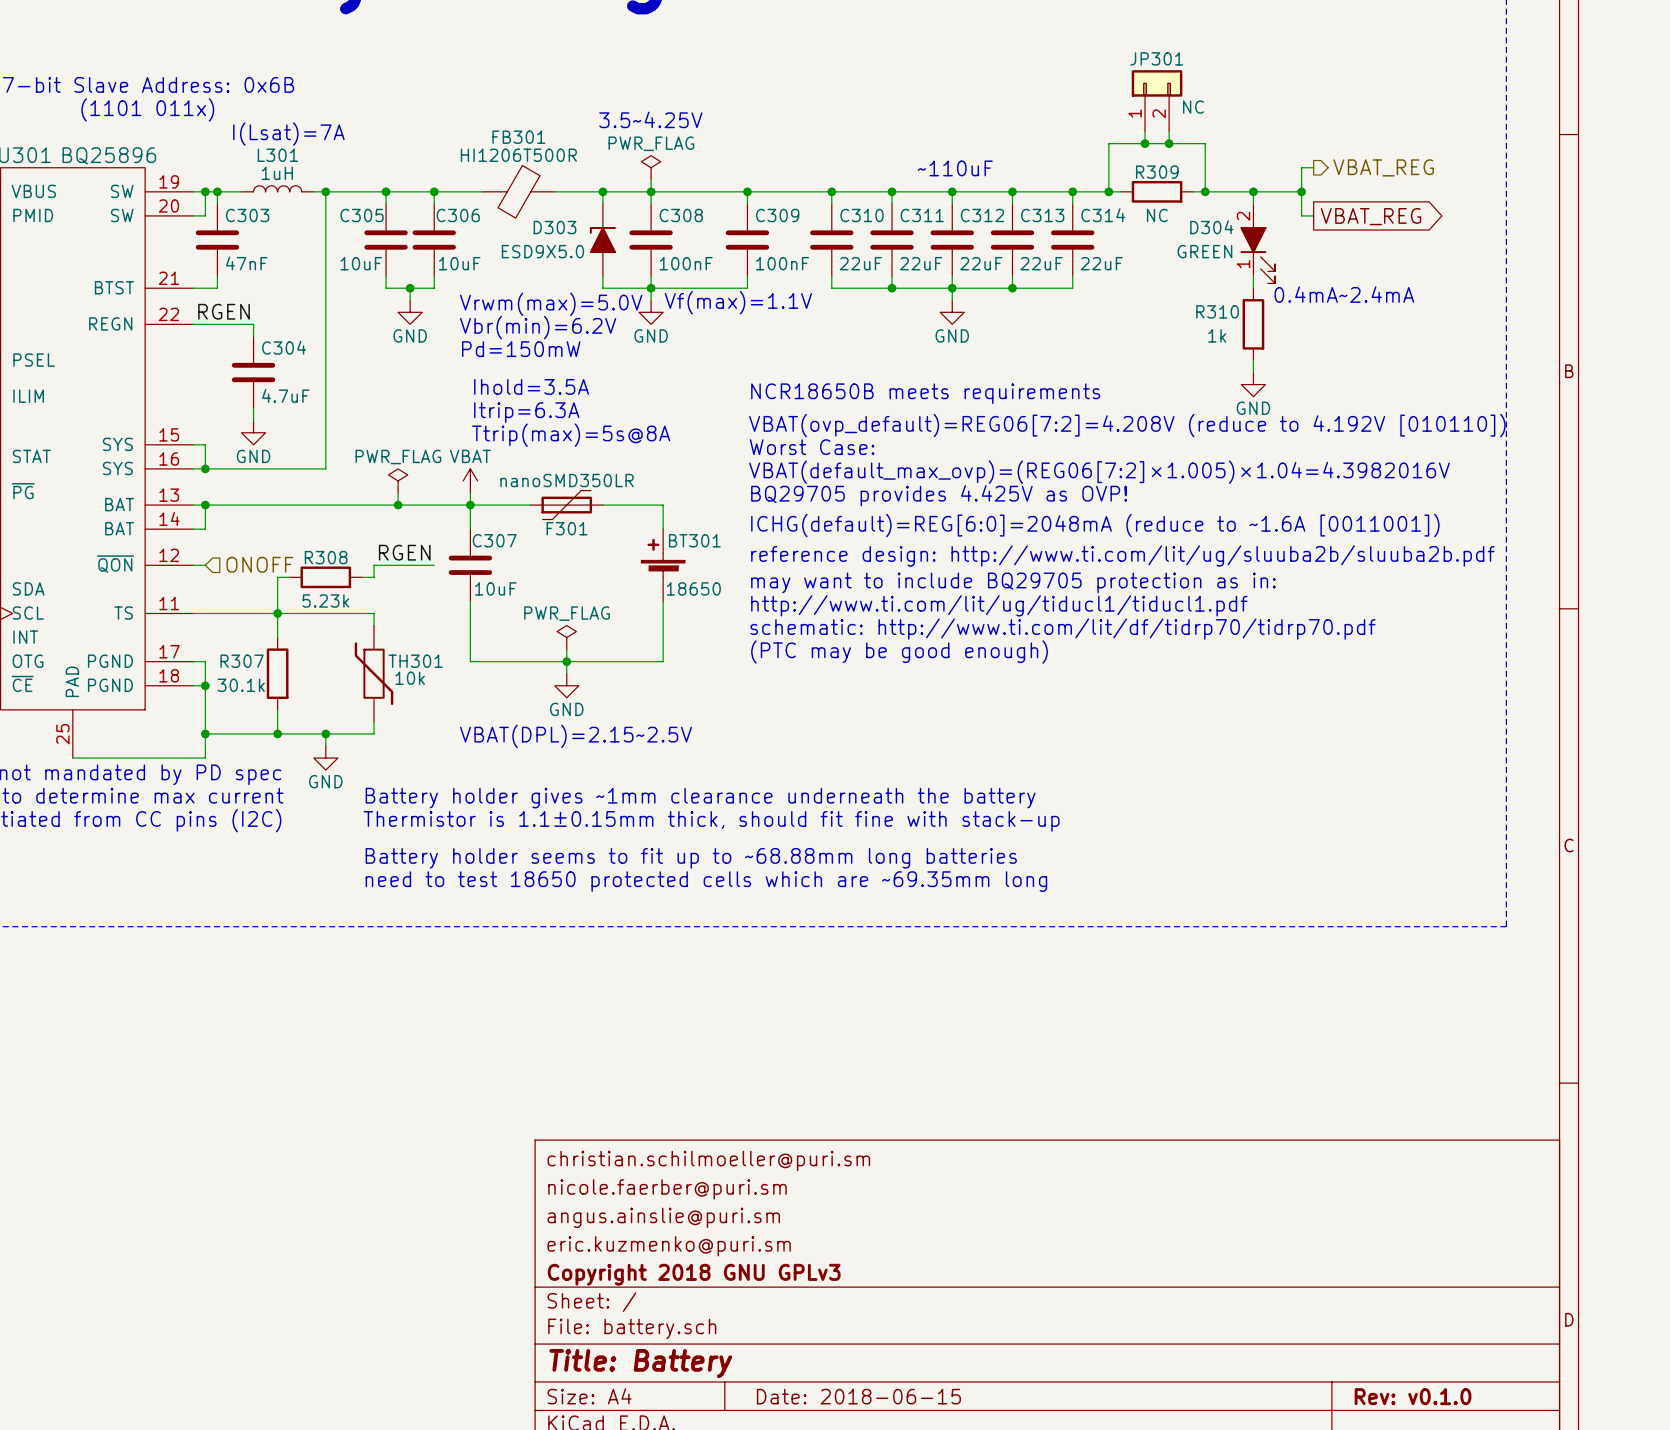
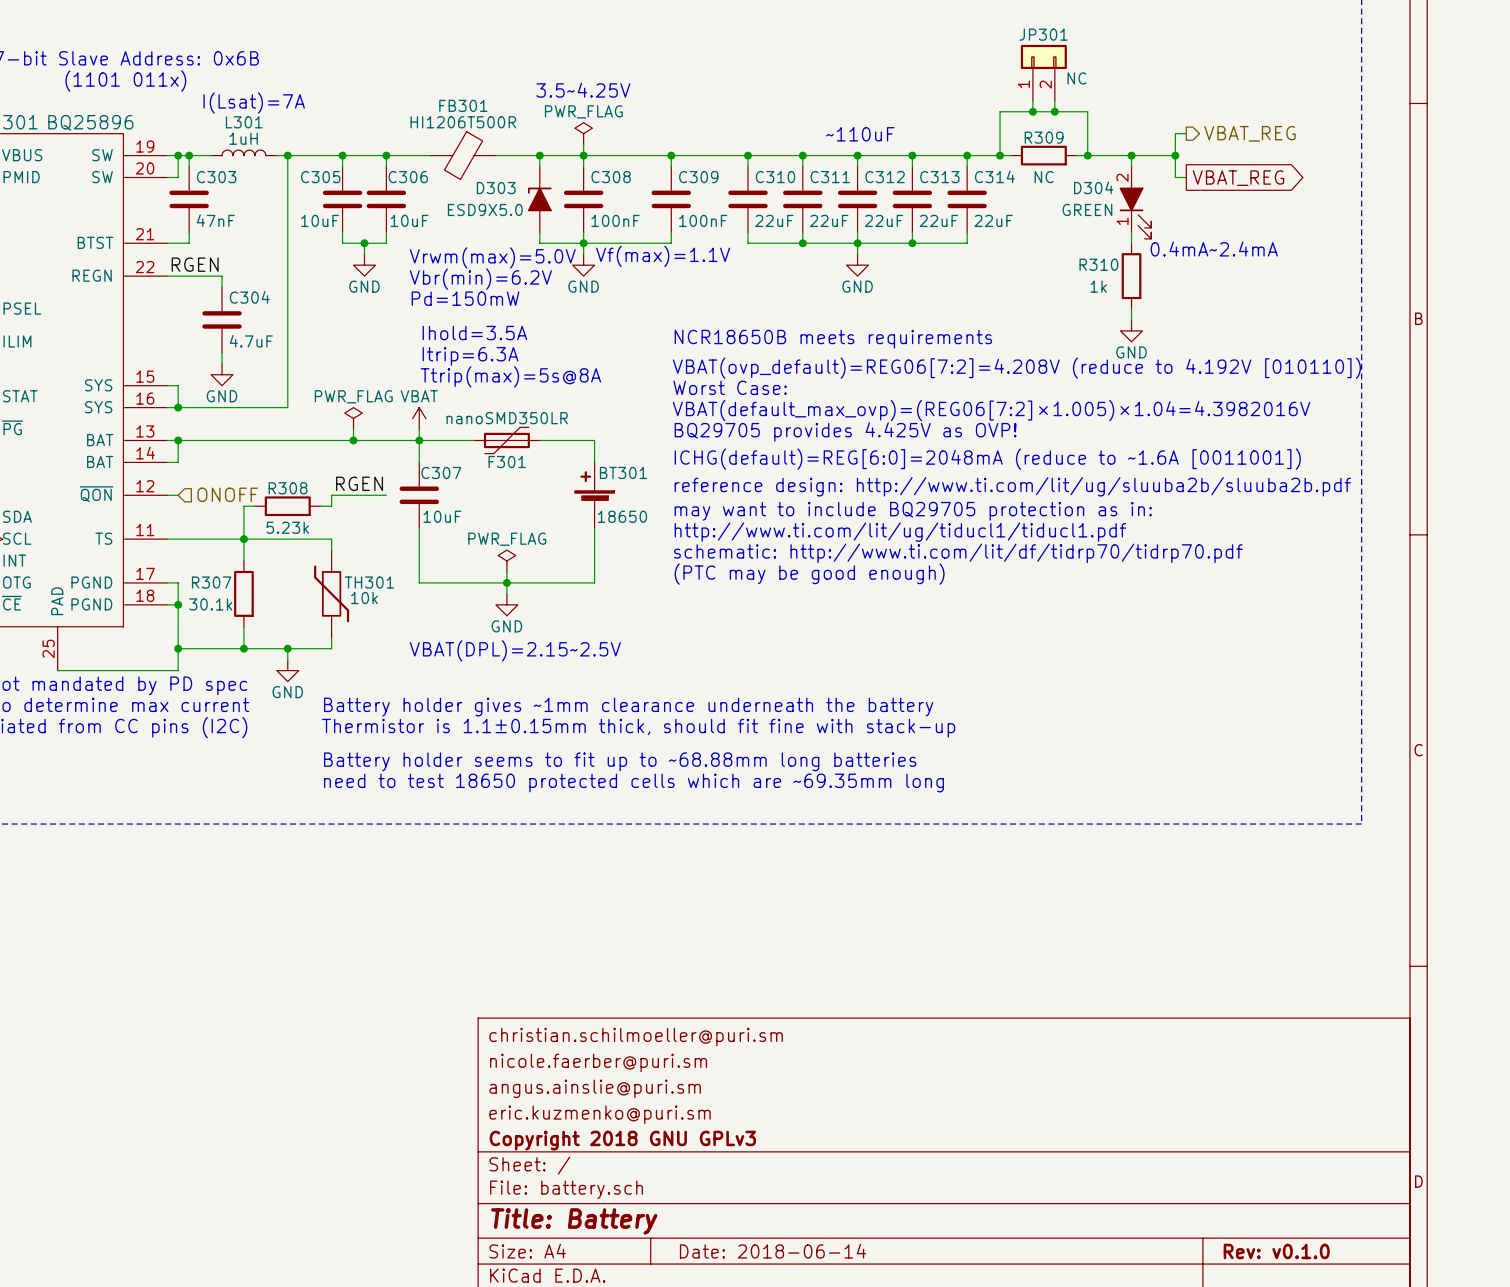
title block: Date: 2018-06-15 (858, 1396) -> Date: 2018-06-14 (772, 1251)

